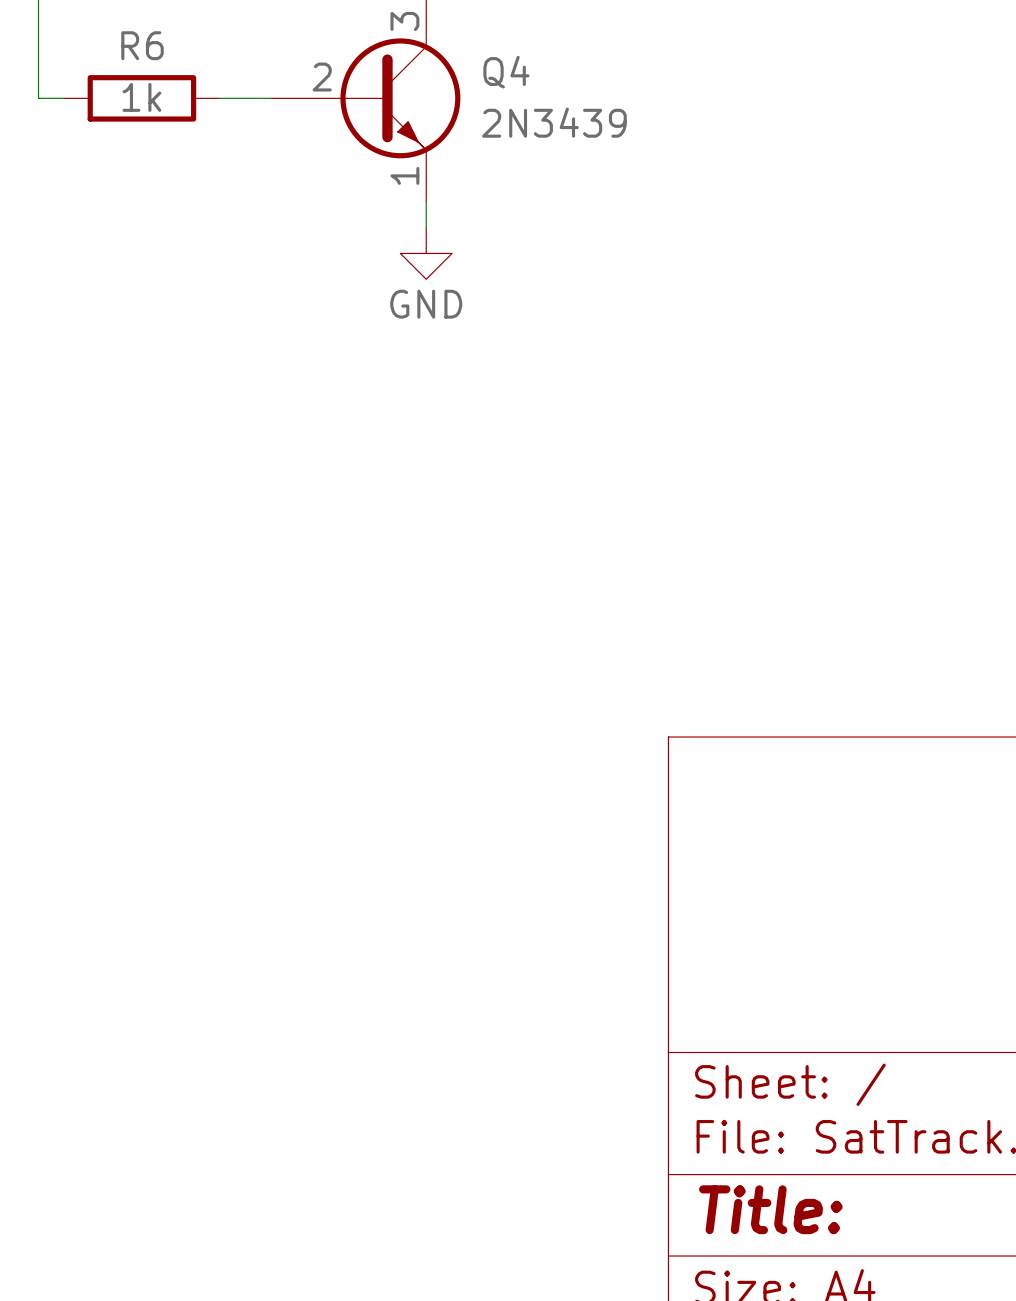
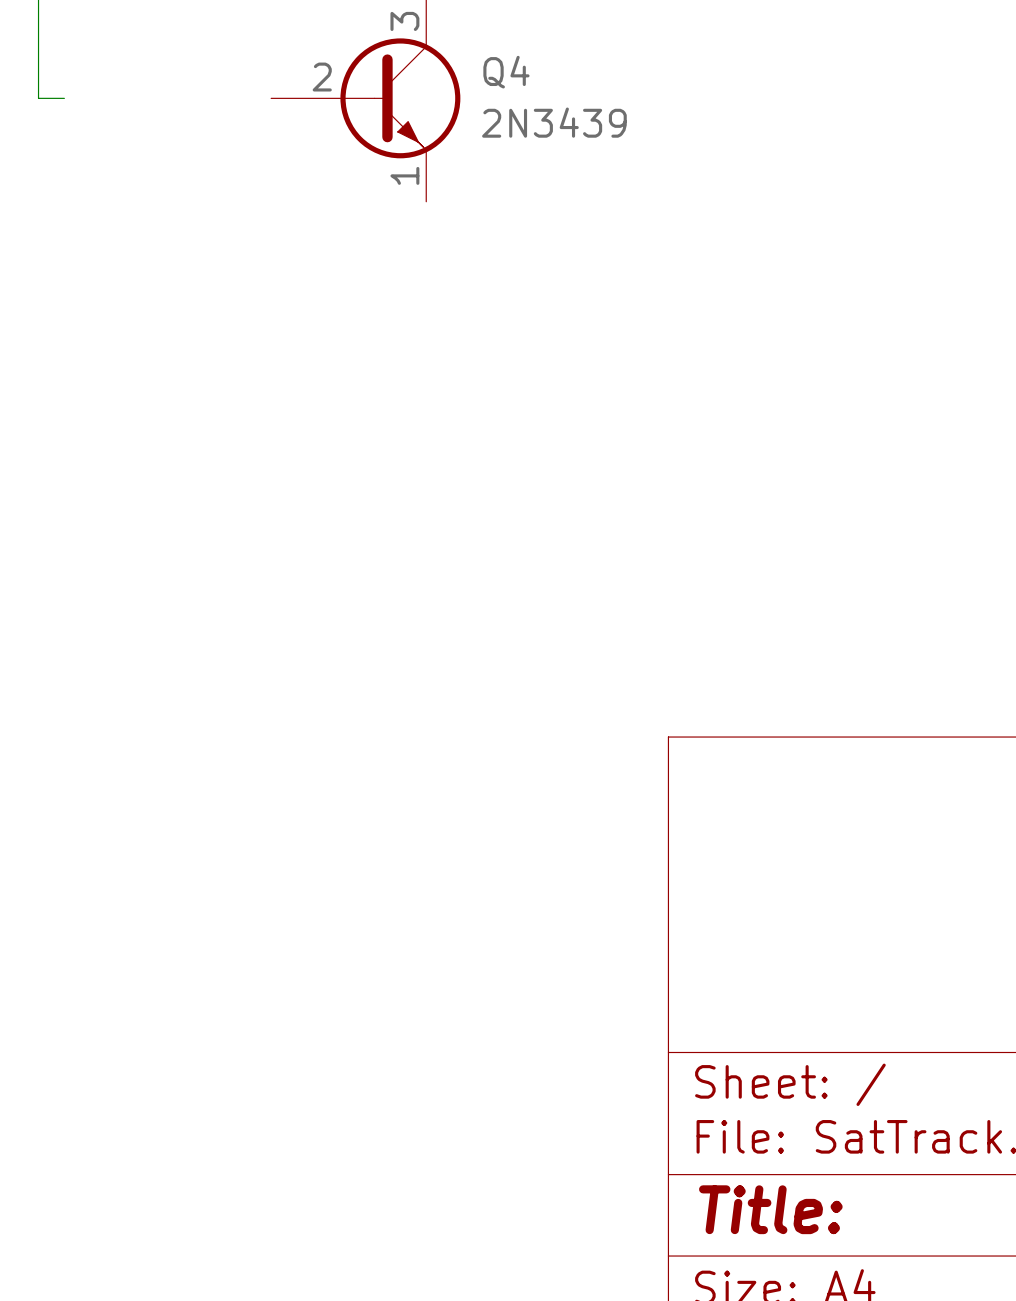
R6: 1k (141, 98) -> none
wire: (219, 98) (271, 98) -> none
wire: (426, 201) (426, 227) -> none
power symbol: GND (426, 253) -> none

